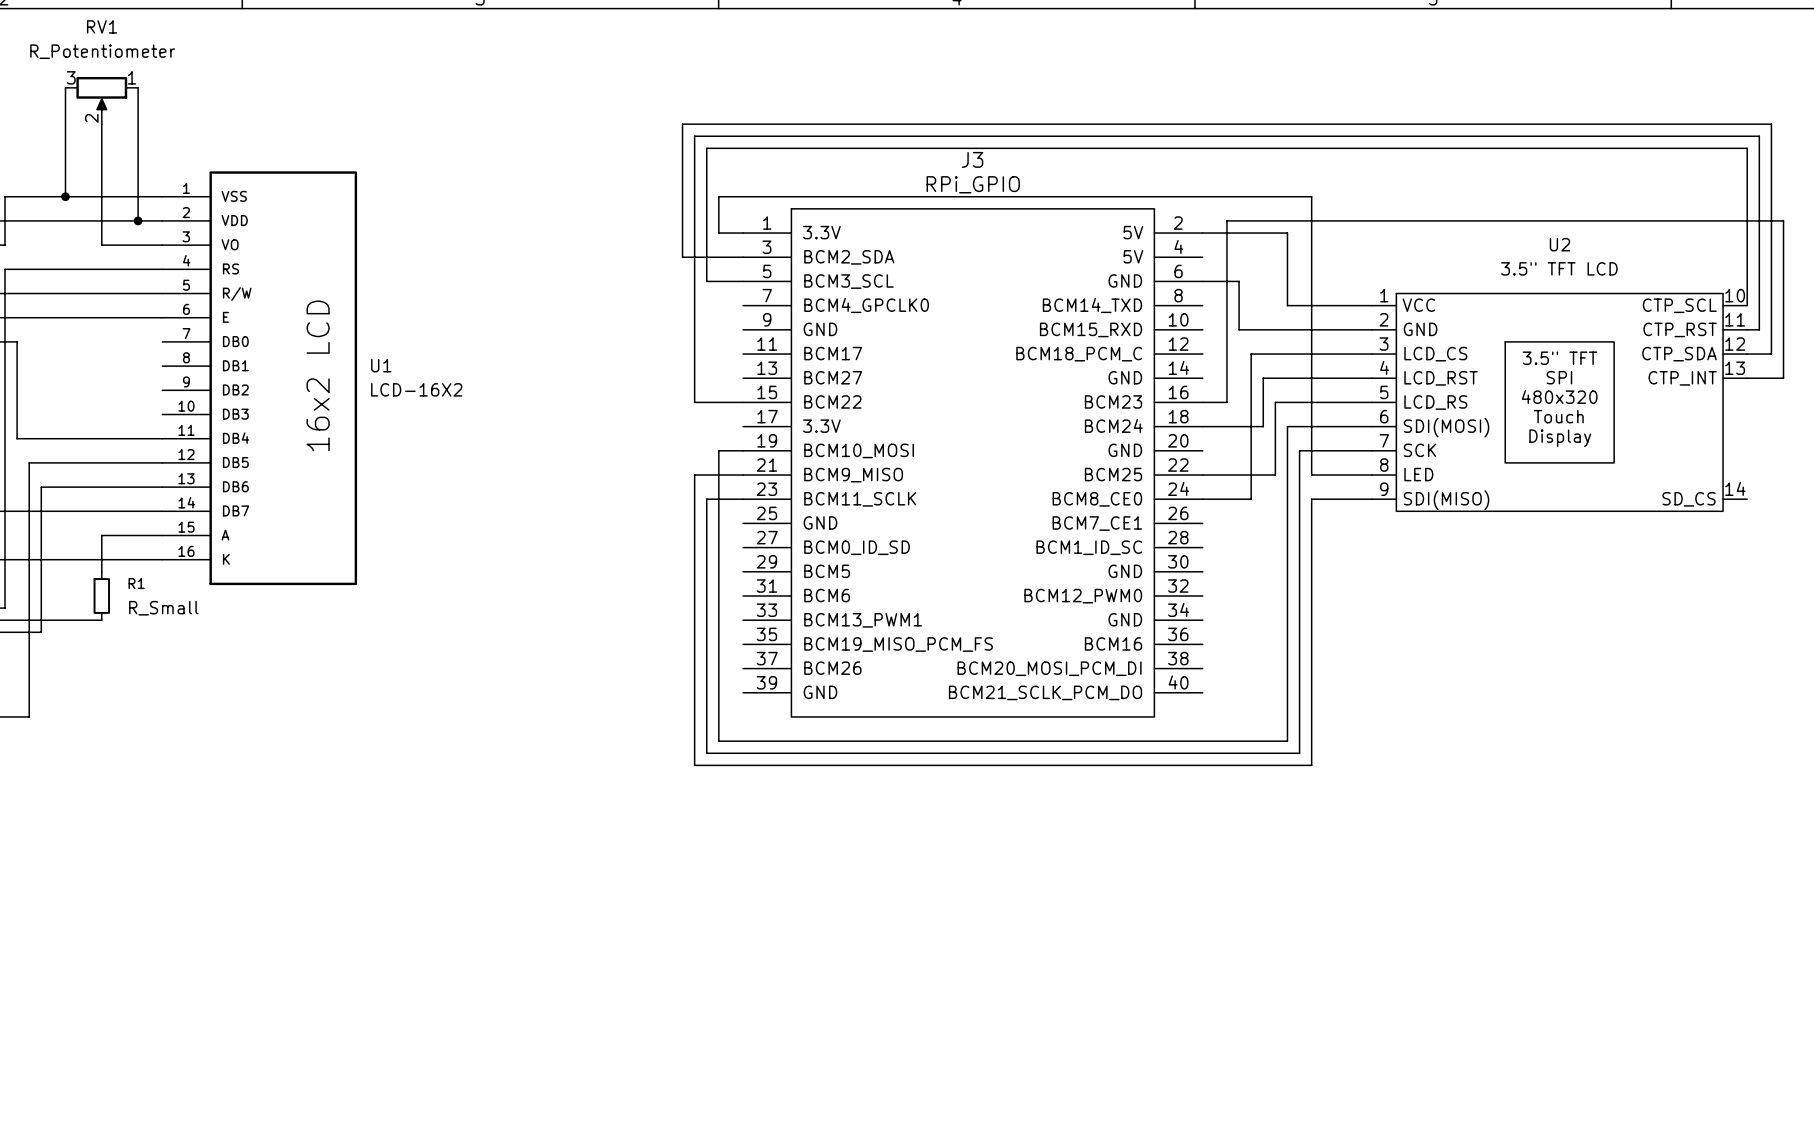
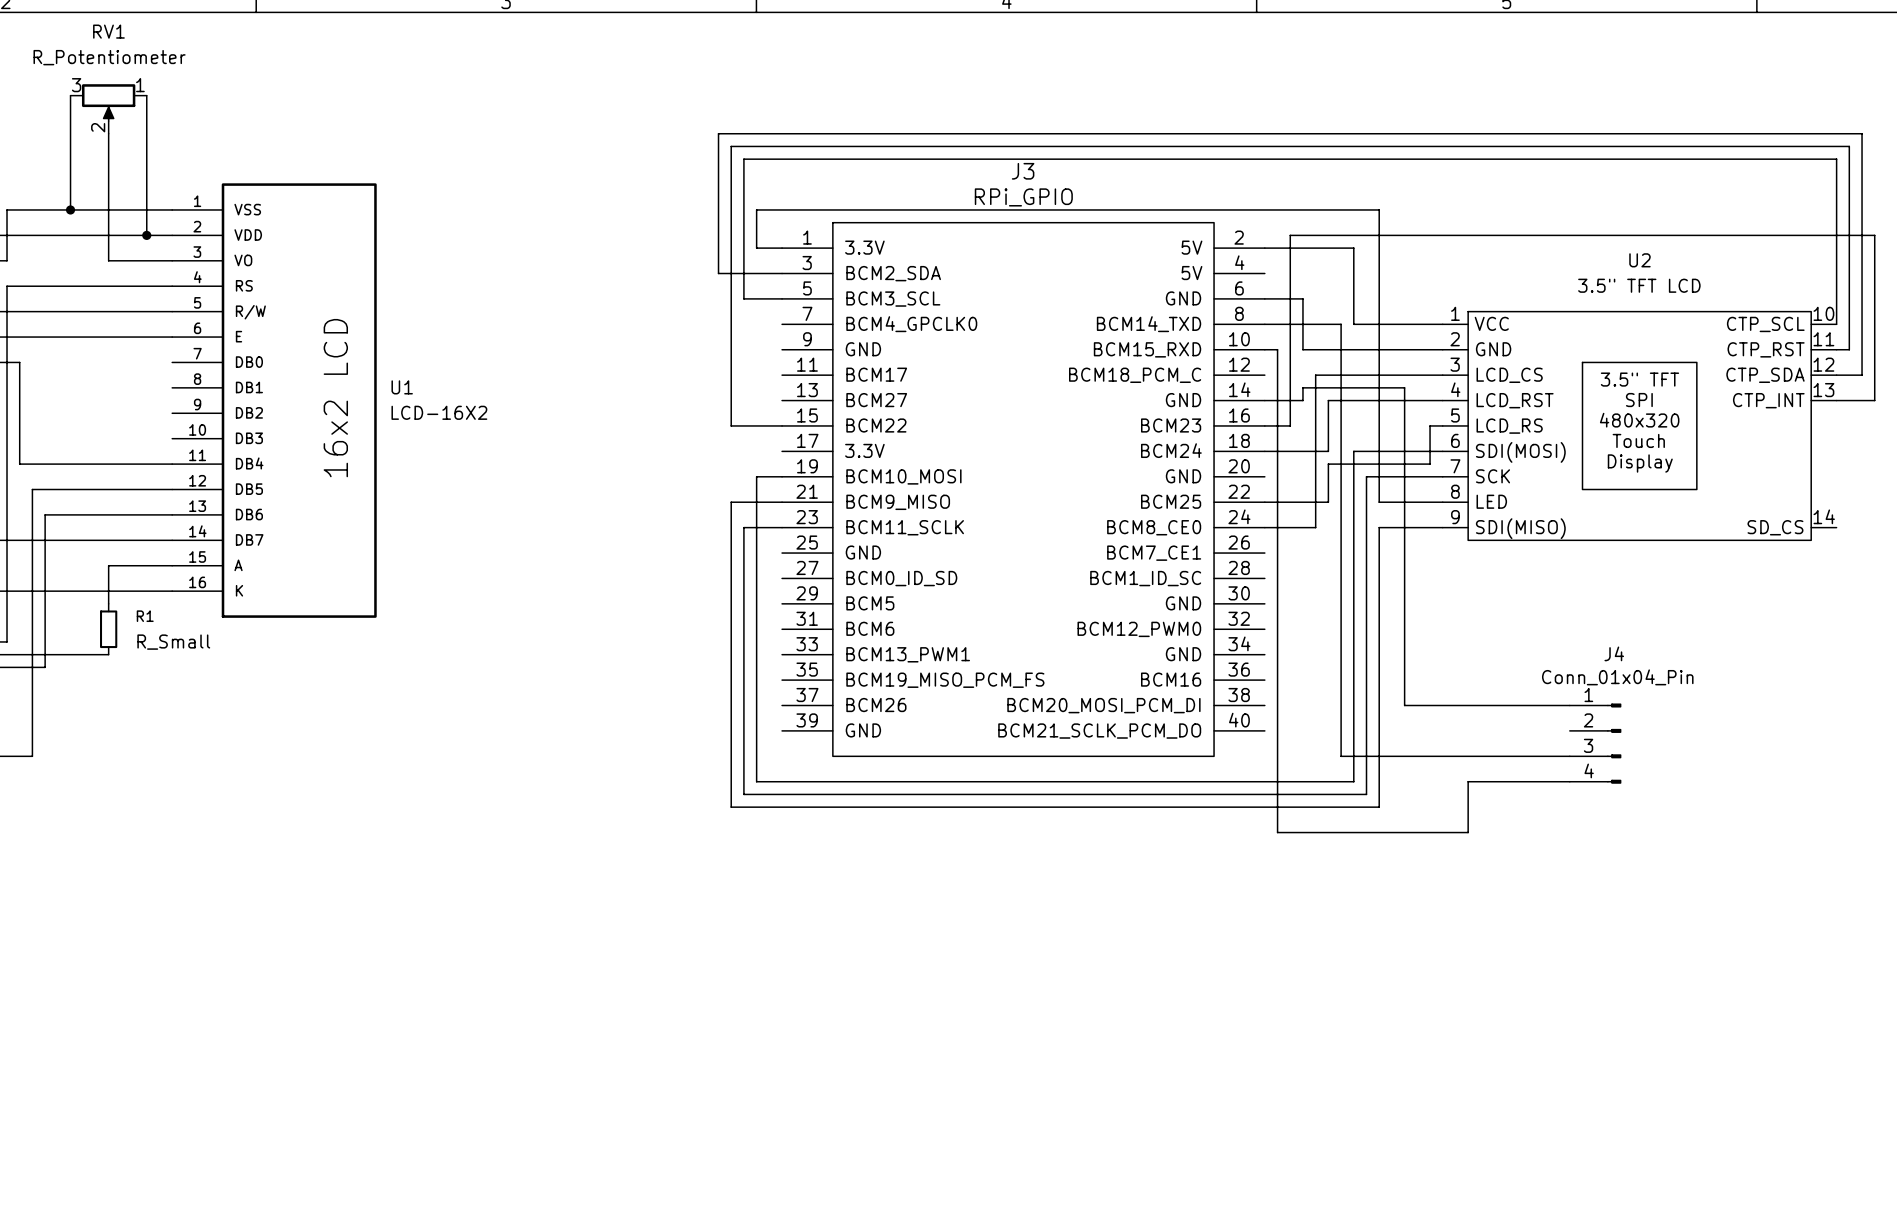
wire: none -> (1264, 324) (1341, 324) (1341, 425)
wire: none -> (1264, 349) (1277, 349) (1277, 832) (1468, 832) (1468, 781) (1569, 781)
wire: none -> (1264, 400) (1302, 400) (1302, 387) (1404, 387) (1404, 705) (1569, 705)
wire: (1275, 402) (1360, 402) -> (1328, 502) (1328, 464) (1430, 464) (1430, 425)
wire: (1263, 475) (1275, 475) -> (1569, 756) (1341, 756) (1341, 502)
J4: none -> Conn_01x04_Pin (1595, 743)

